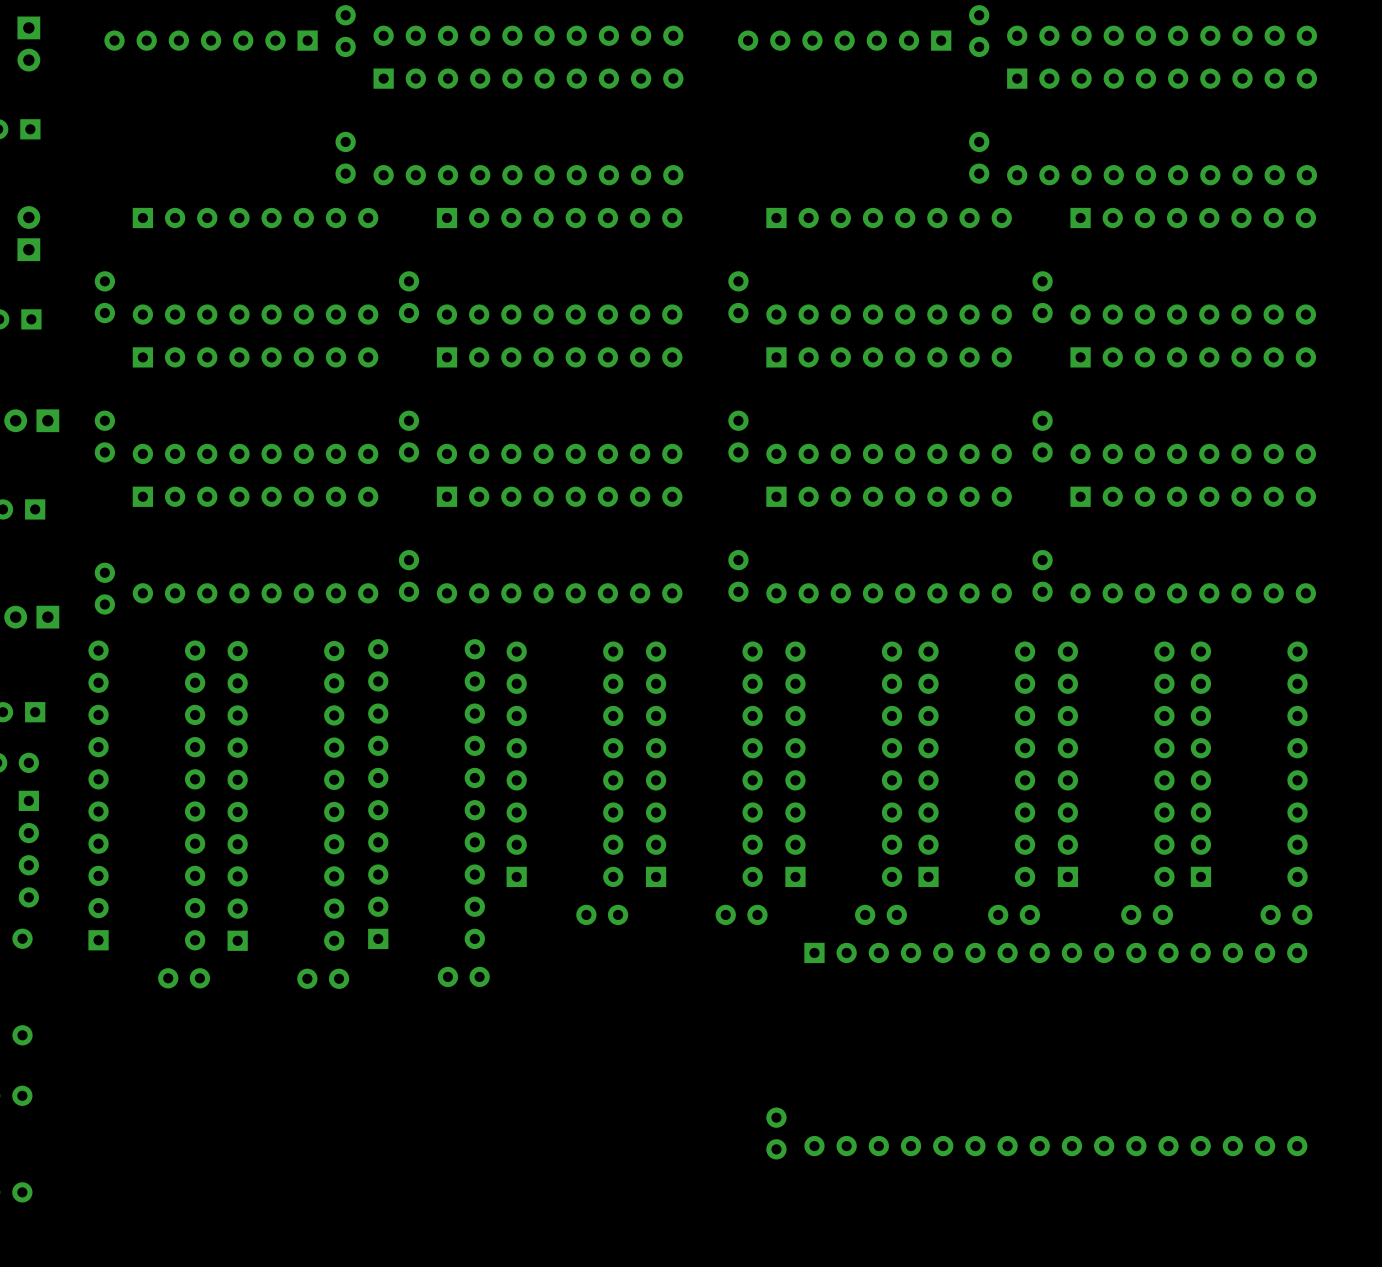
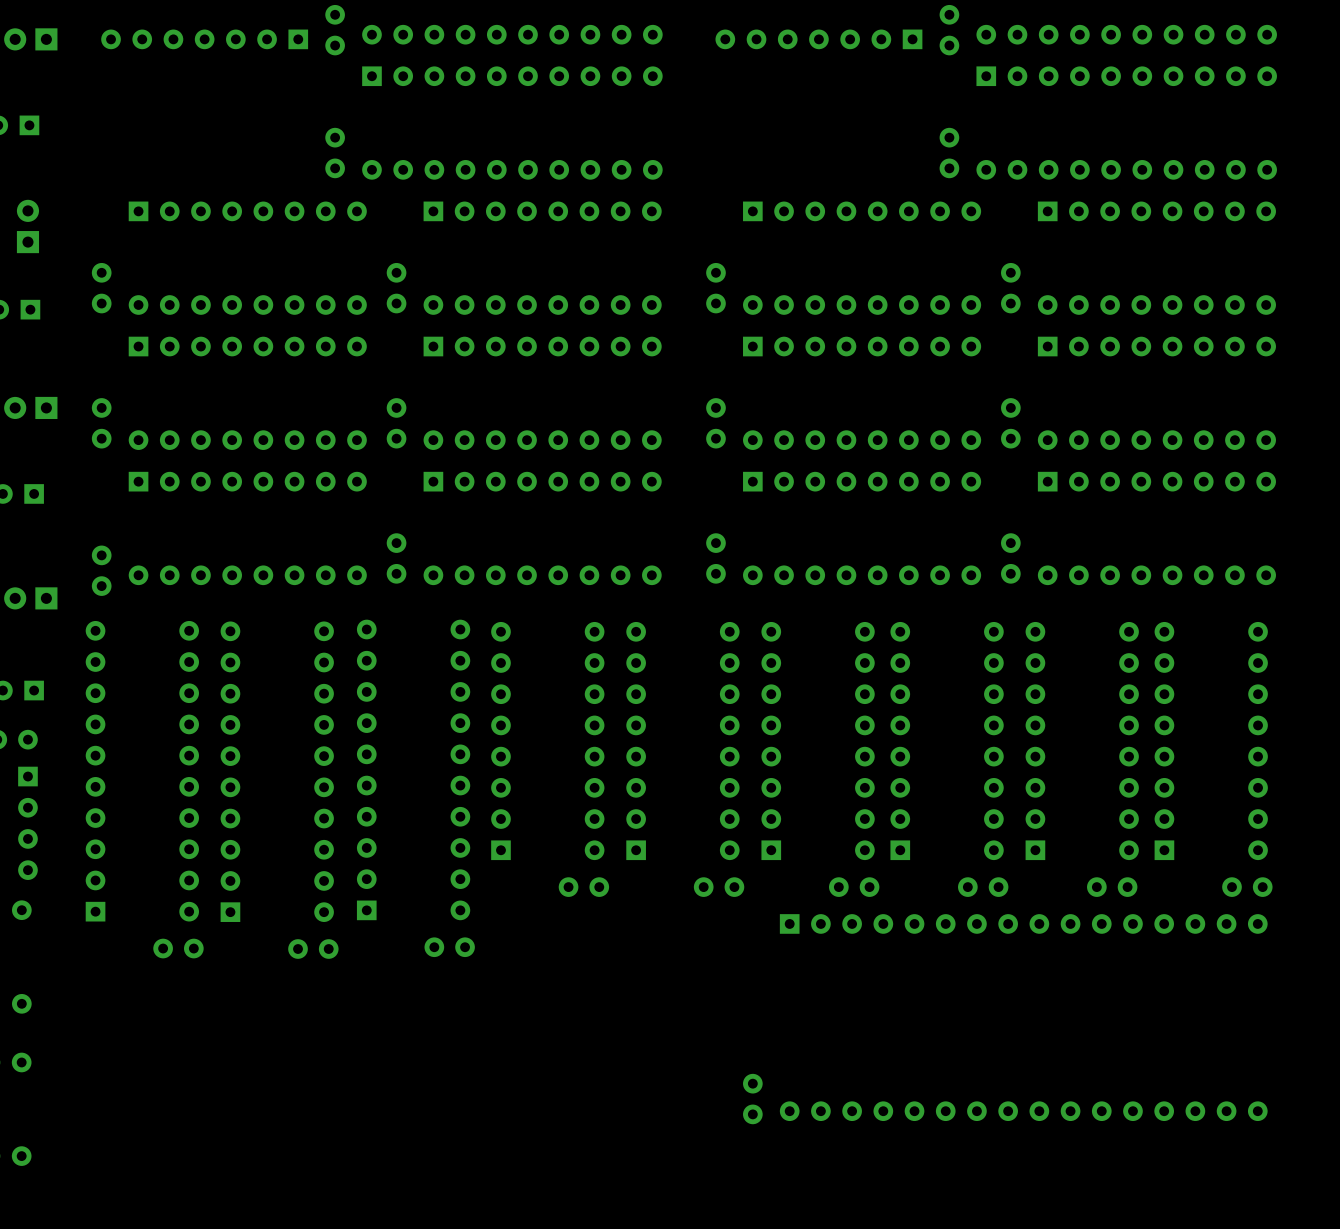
part rotation: 0° (28, 44) -> 90° clockwise (30, 39)

